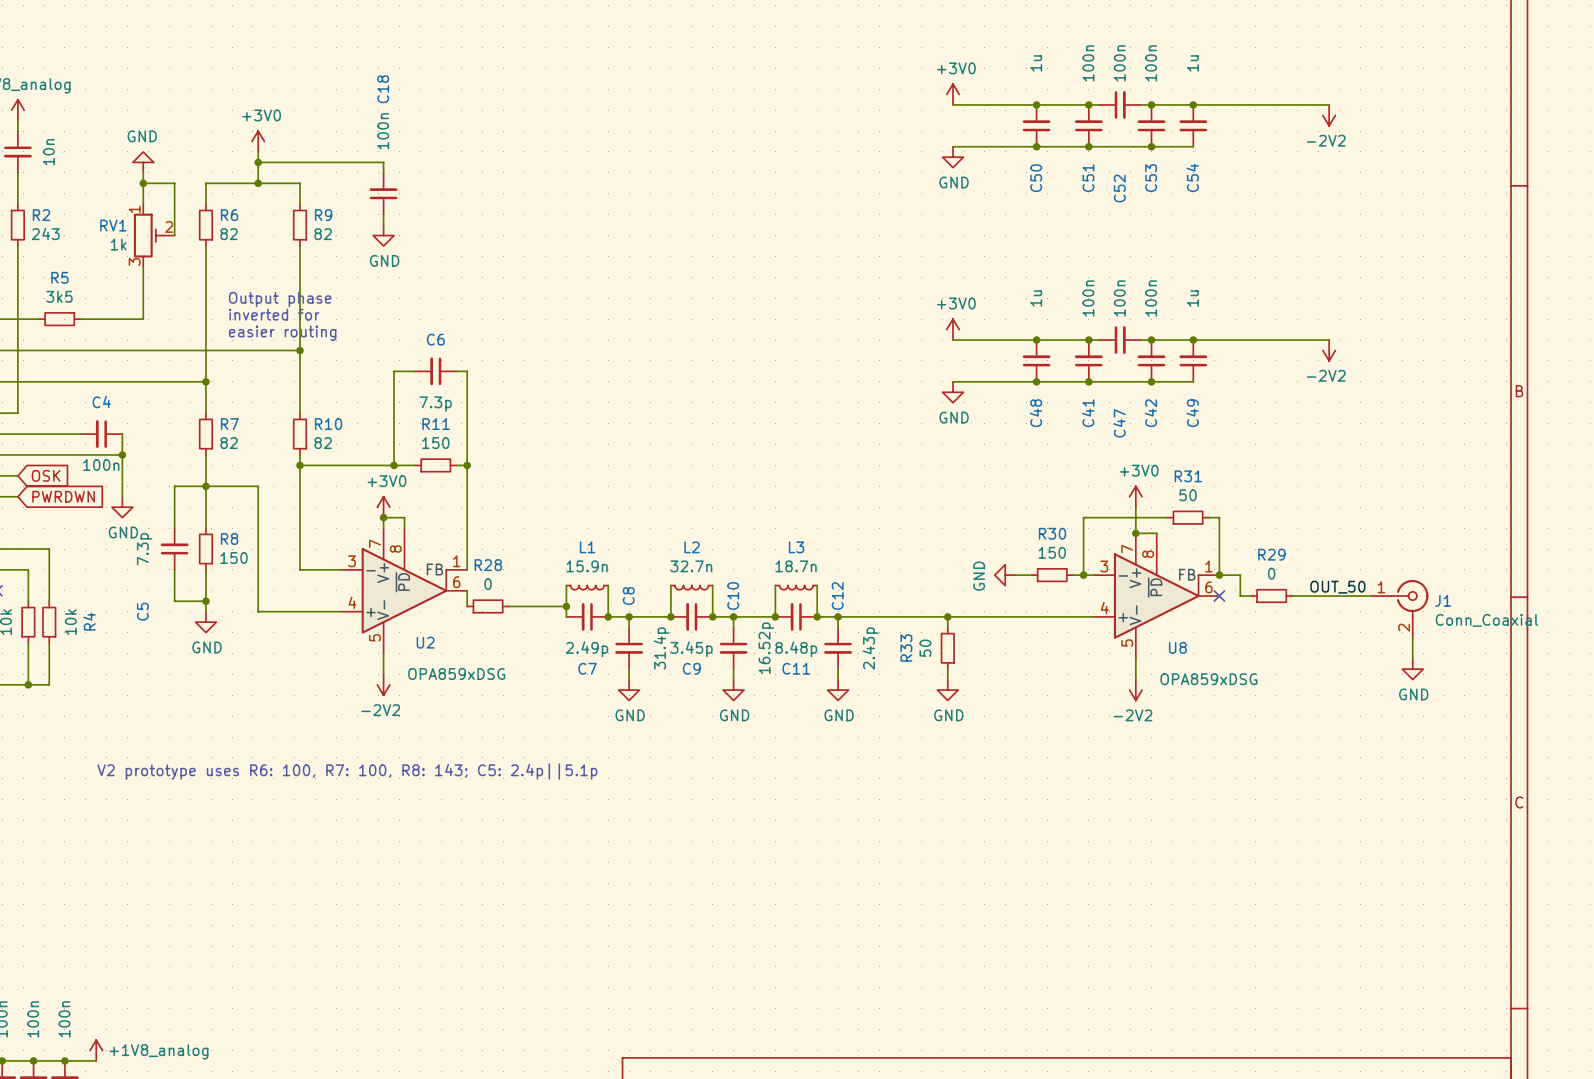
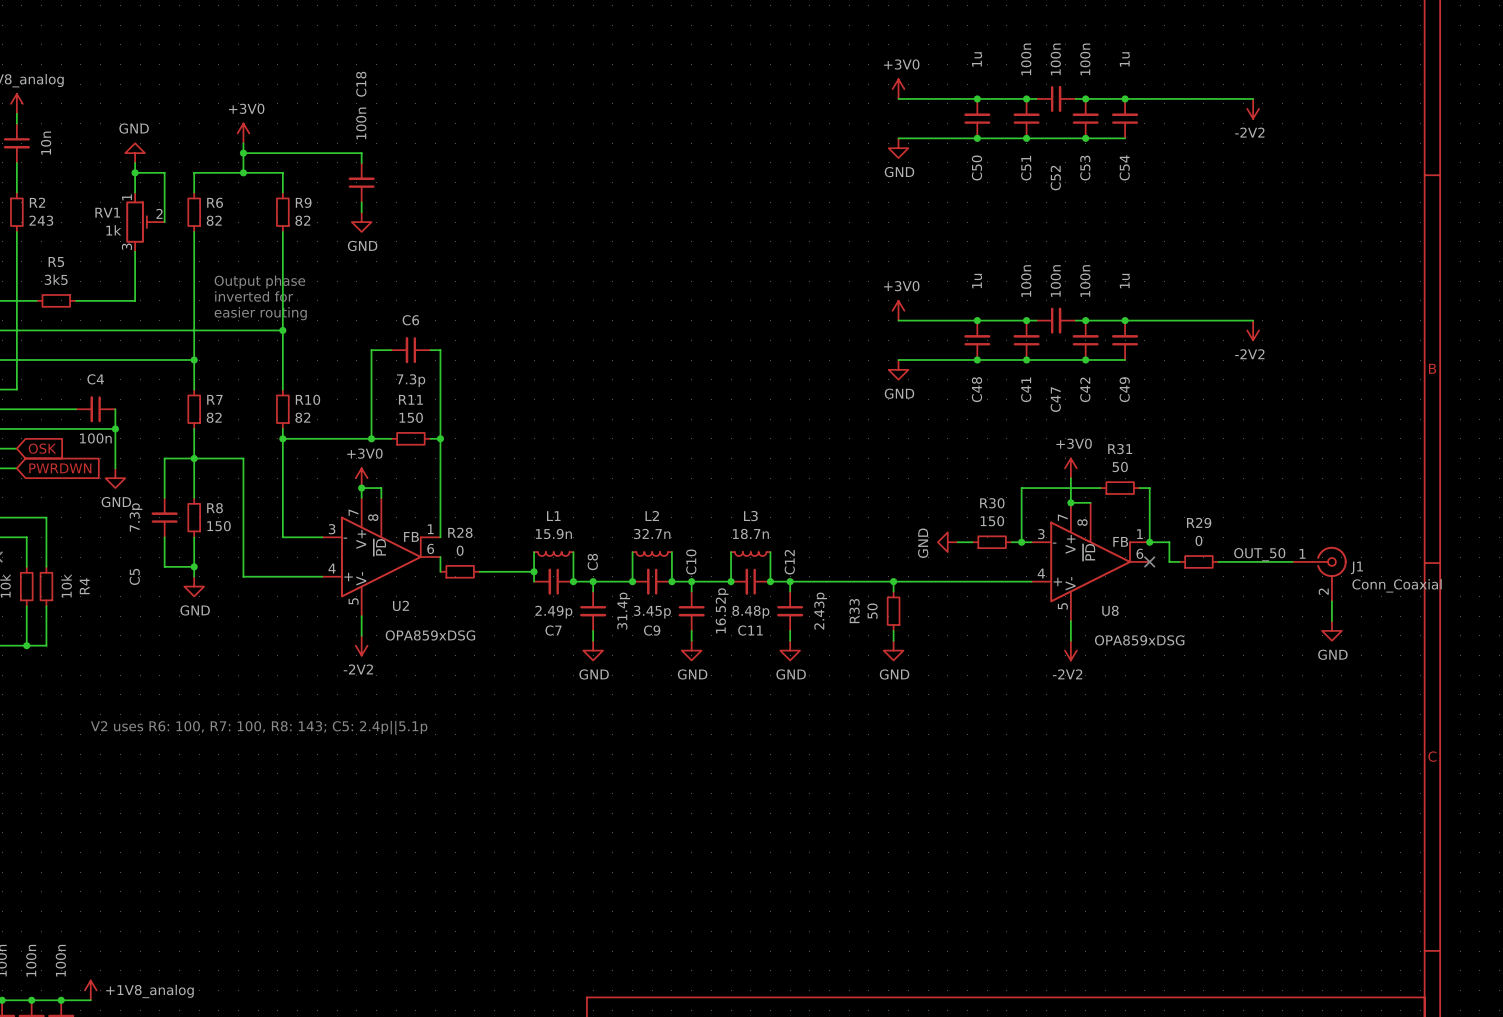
text: V2 prototype uses R6: 100, R7: 100, R8: 143; C5: 2.4p||5.1p (347, 771) -> V2 uses R6: 100, R7: 100, R8: 143; C5: 2.4p||5.1p (259, 727)

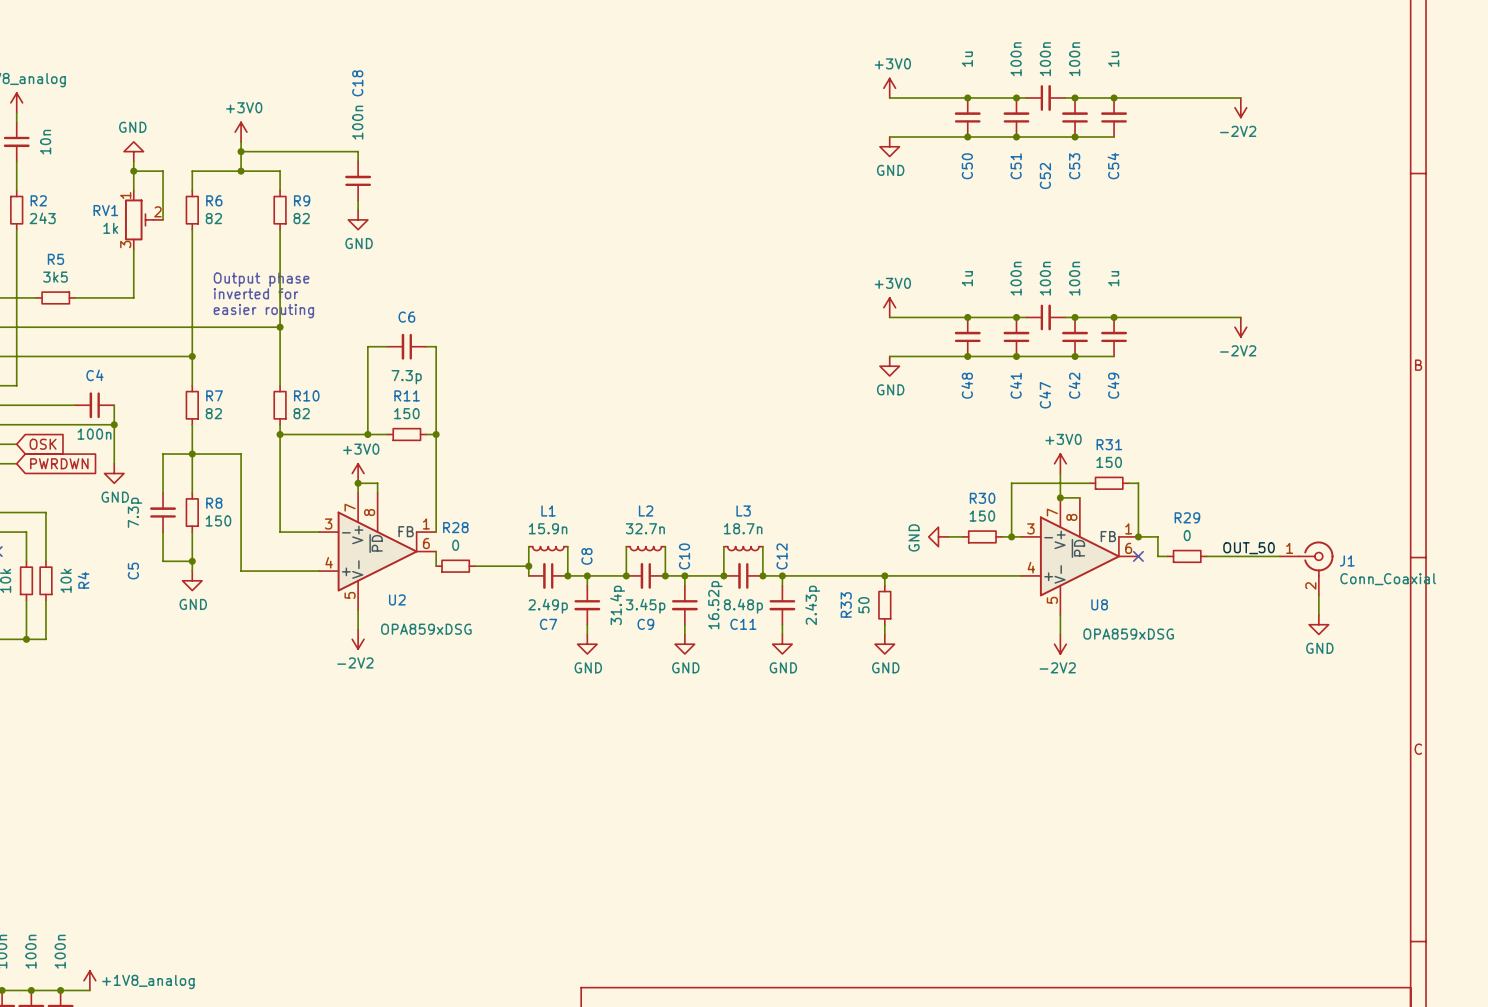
R31 value: 50 (1120, 467) -> 150 (1109, 462)
text: V2 uses R6: 100, R7: 100, R8: 143; C5: 2.4p||5.1p (259, 727) -> none

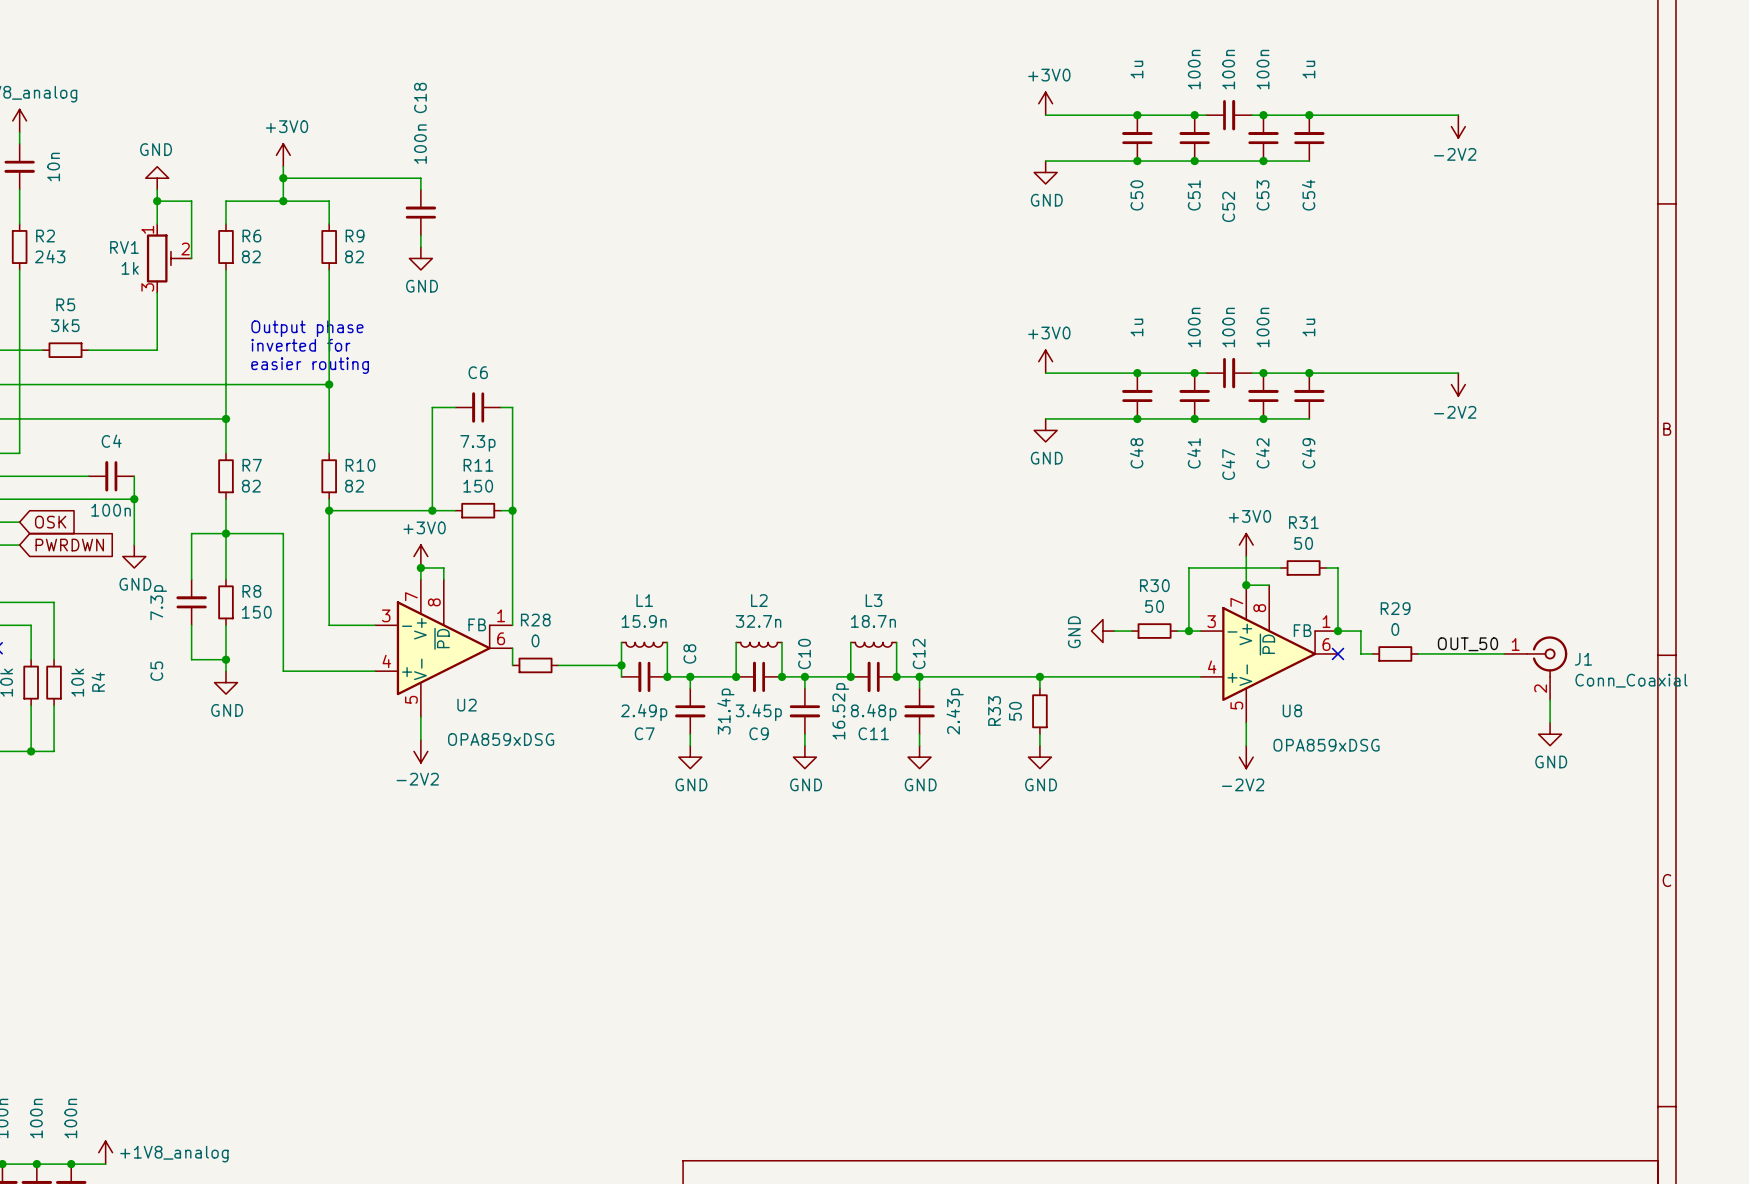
R31 value: 150 (1109, 462) -> 50 (1303, 543)
R30 value: 150 (982, 516) -> 50 (1154, 606)

